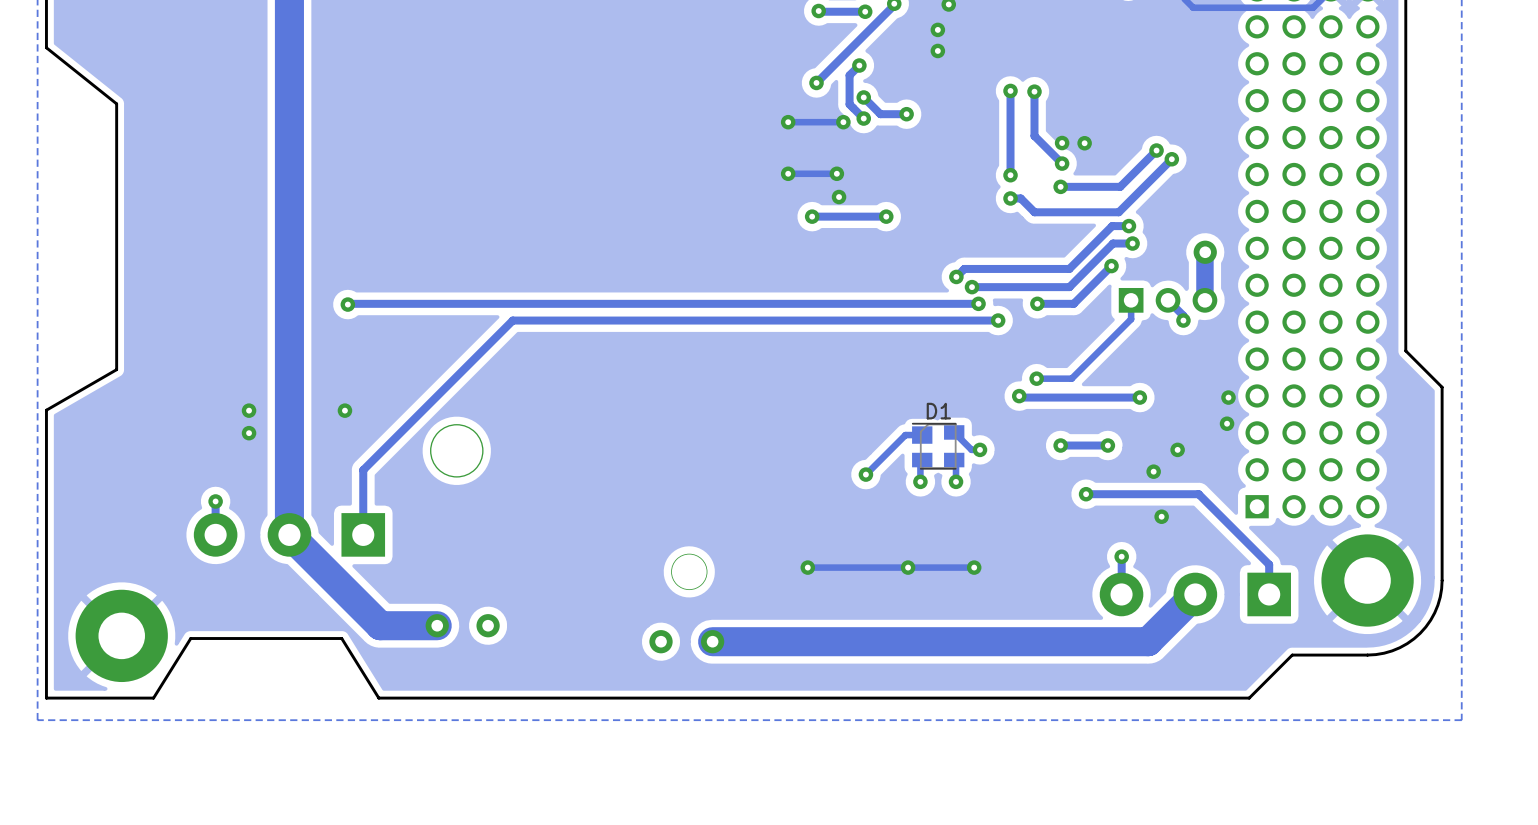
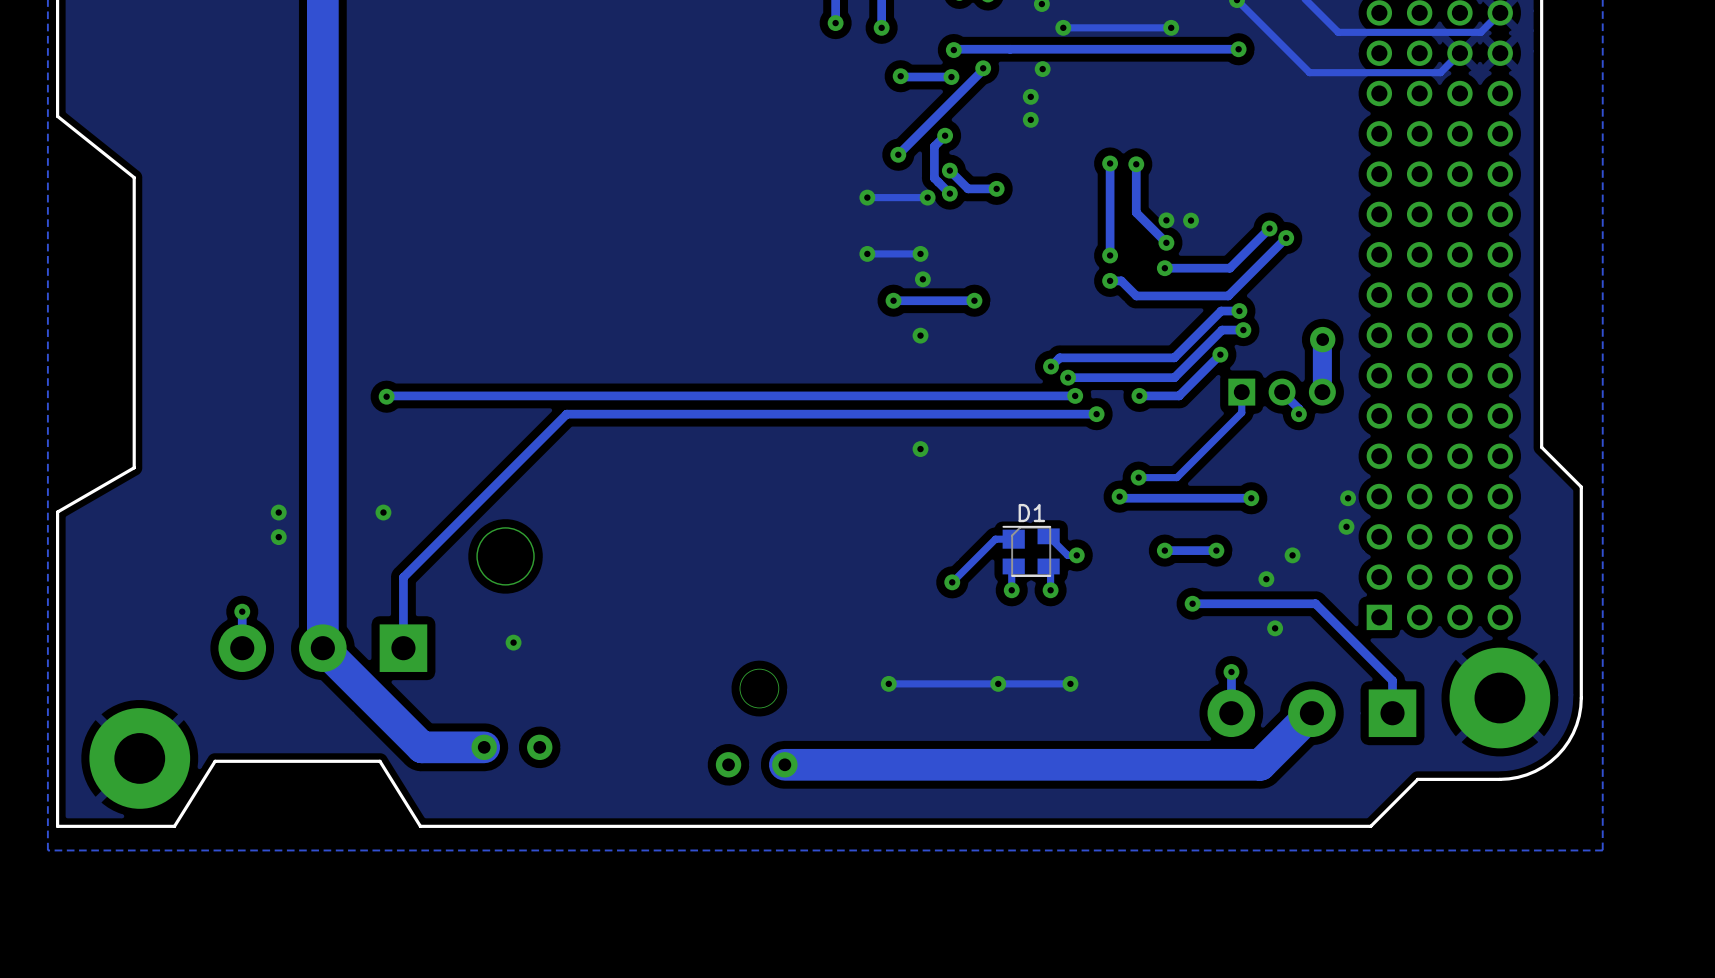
via: none -> (920, 335)
via: none -> (920, 449)
via: none -> (513, 642)

